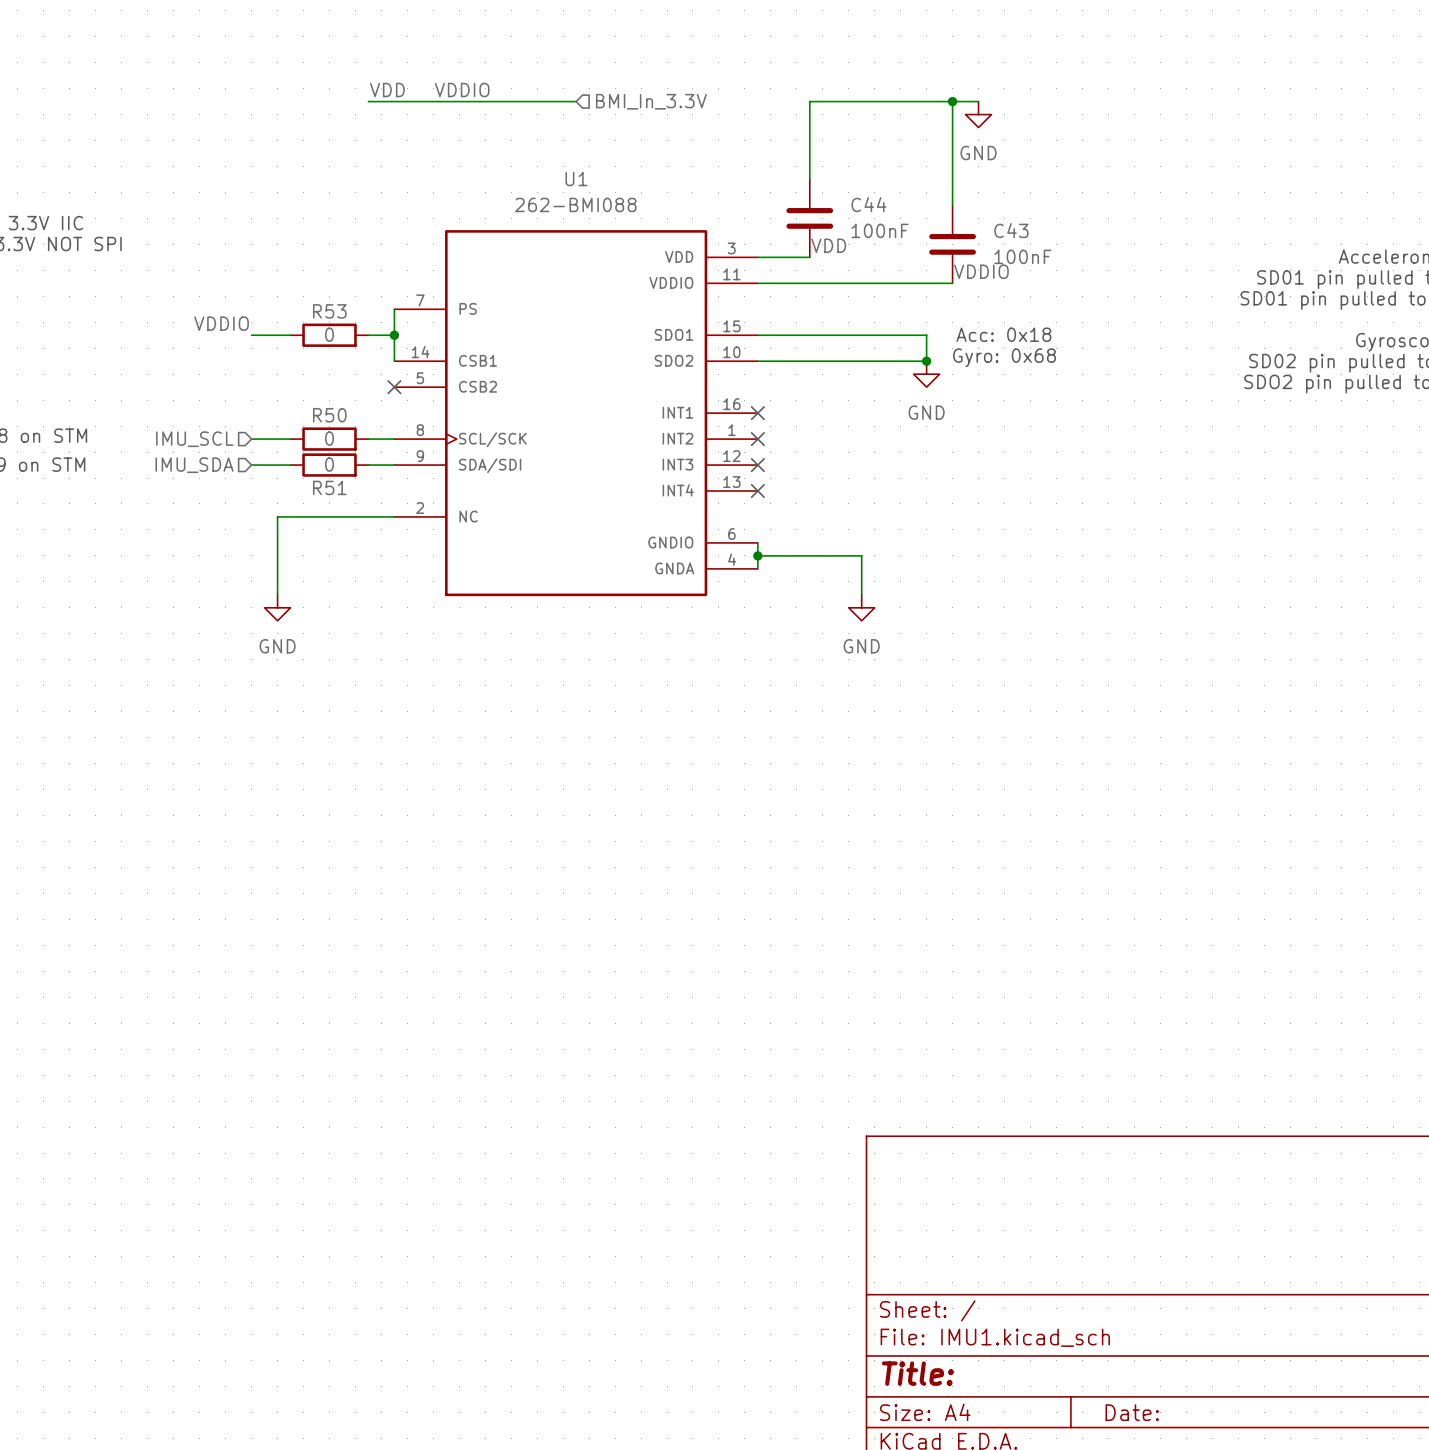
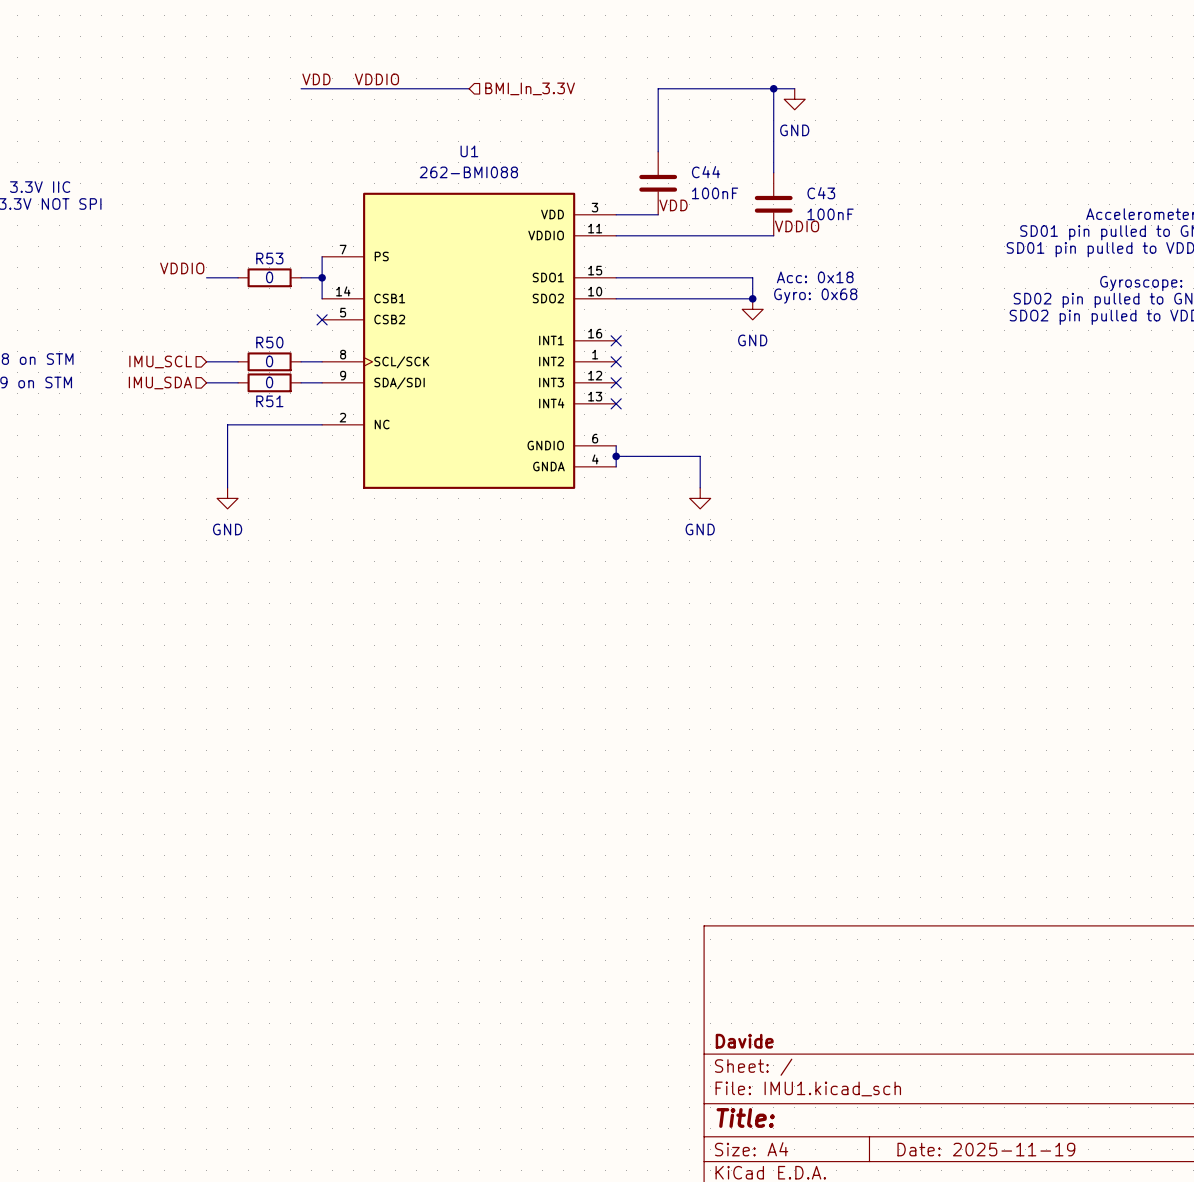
title block: none -> Davide (744, 1041)
title block: Date: (1132, 1412) -> Date: 2025-11-19 (986, 1149)

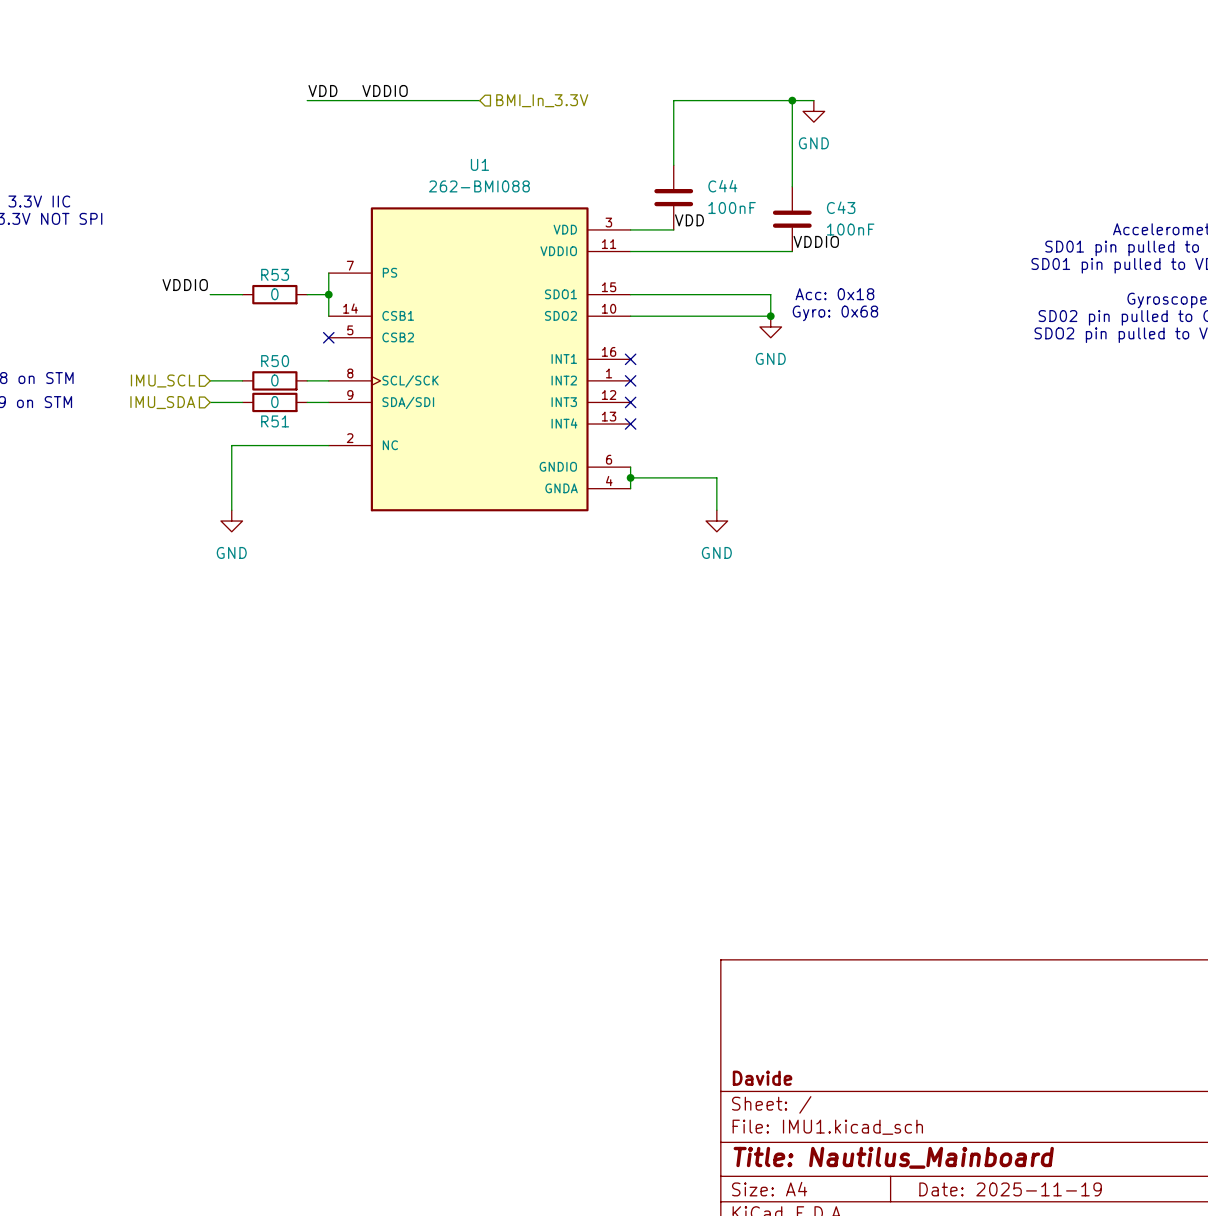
title block: Title: (745, 1117) -> Title: Nautilus_Mainboard (893, 1157)

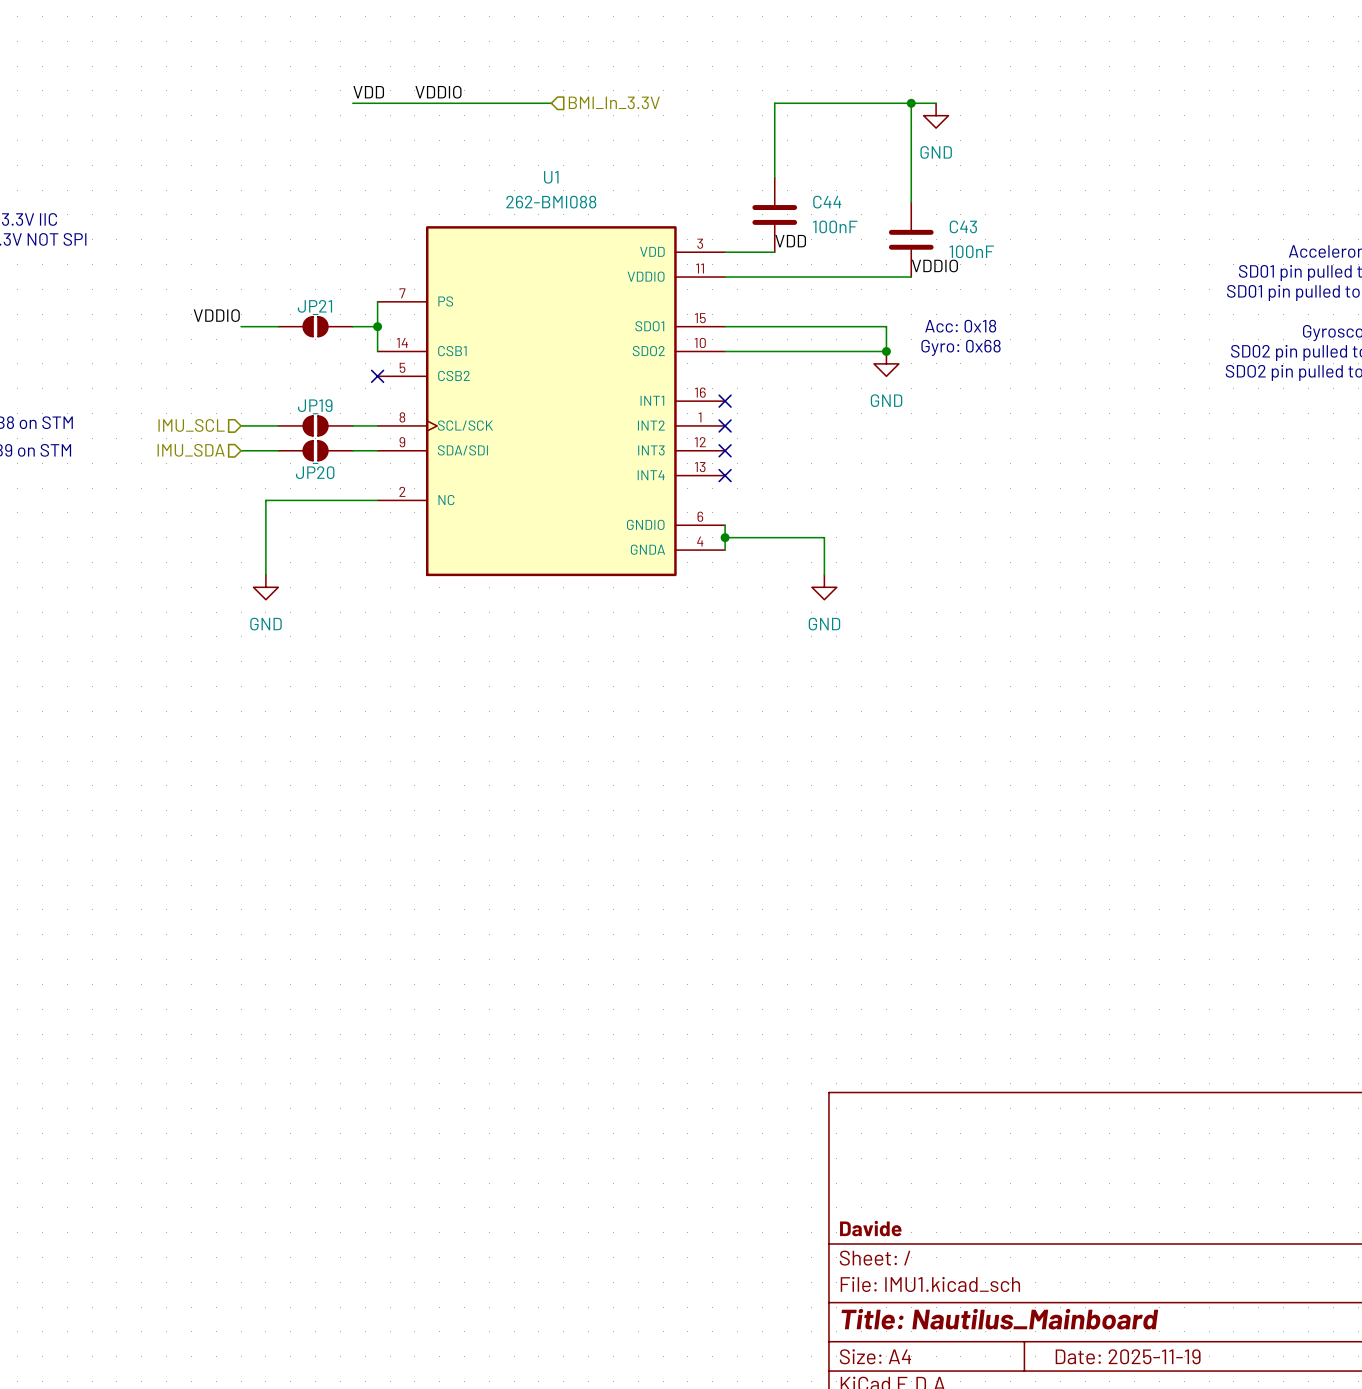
R53: 0 (274, 294) -> none
JP21: none -> - (315, 326)
R50: 0 (274, 380) -> none
JP19: none -> - (315, 425)
R51: 0 (274, 402) -> none
JP20: none -> - (315, 450)

